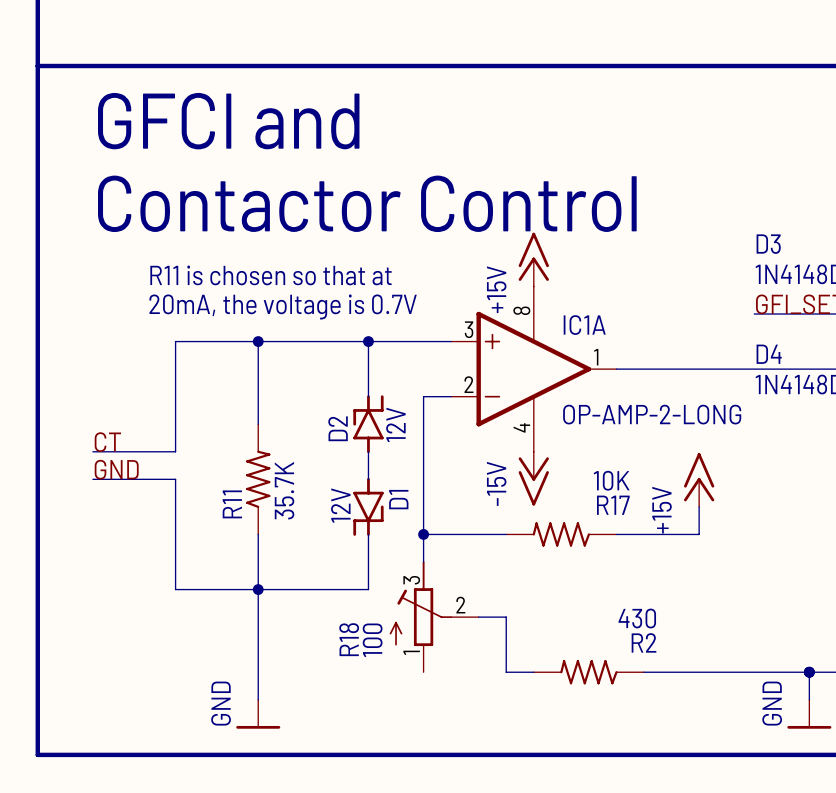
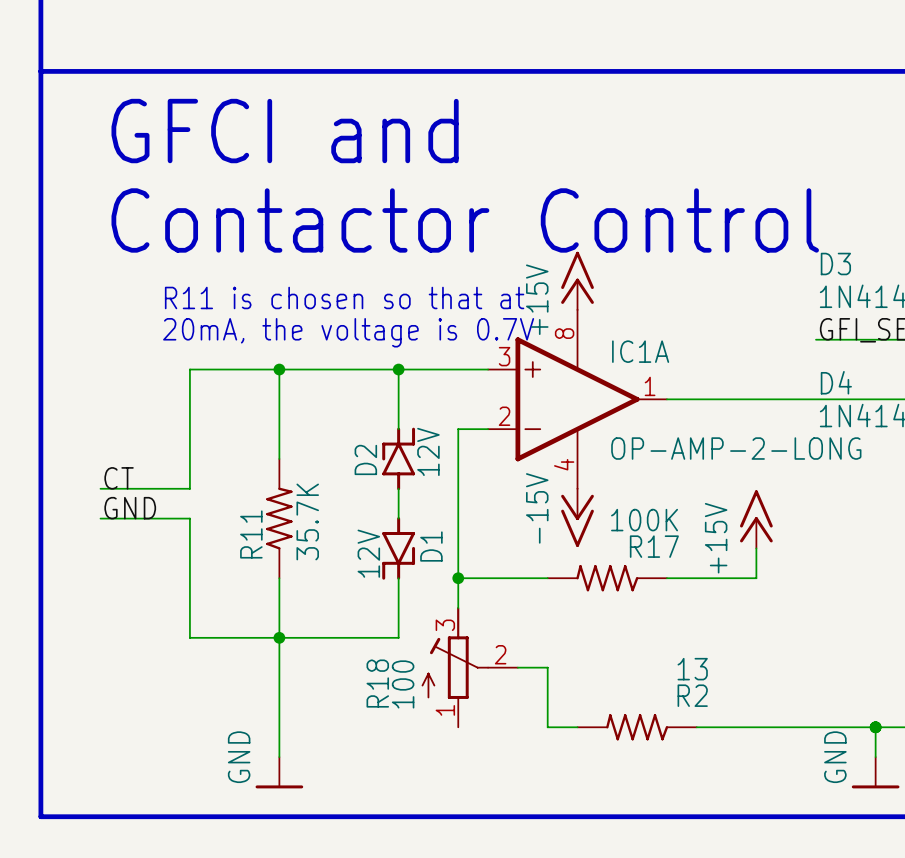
R17 value: 10K (611, 480) -> 100K (644, 520)
R2 value: 430 (637, 618) -> 13 (692, 669)

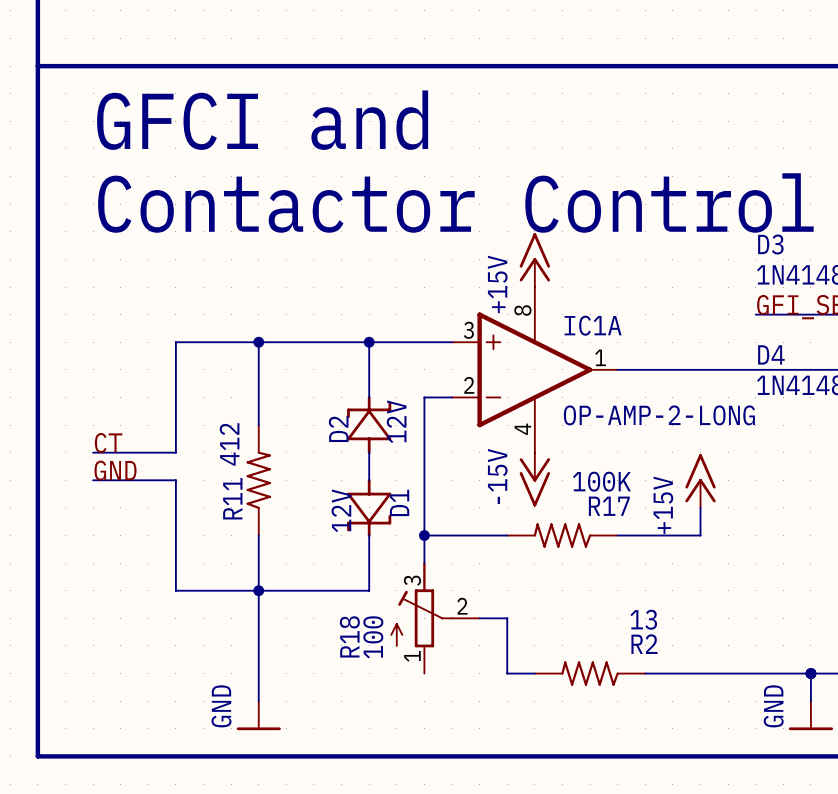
text: R11 is chosen so that at (344, 297) -> none
text: 20mA, the voltage is 0.7V (348, 332) -> none
D2 symbol: [382, 427, 416, 491] -> [347, 396, 392, 455]
D1 symbol: [382, 517, 416, 580] -> [347, 478, 392, 537]
R11 value: 35.7K (307, 521) -> 412 (229, 444)

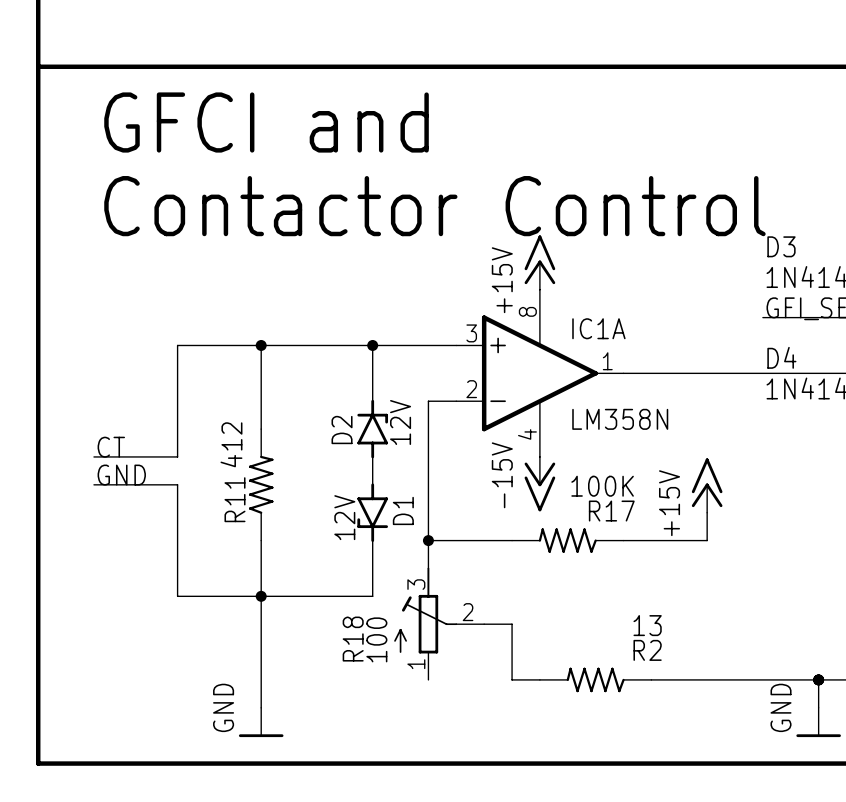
D2 symbol: [347, 396, 392, 455] -> [357, 399, 389, 459]
IC1A value: OP-AMP-2-LONG (659, 415) -> LM358N (620, 419)
D1 symbol: [347, 478, 392, 537] -> [357, 483, 389, 542]

